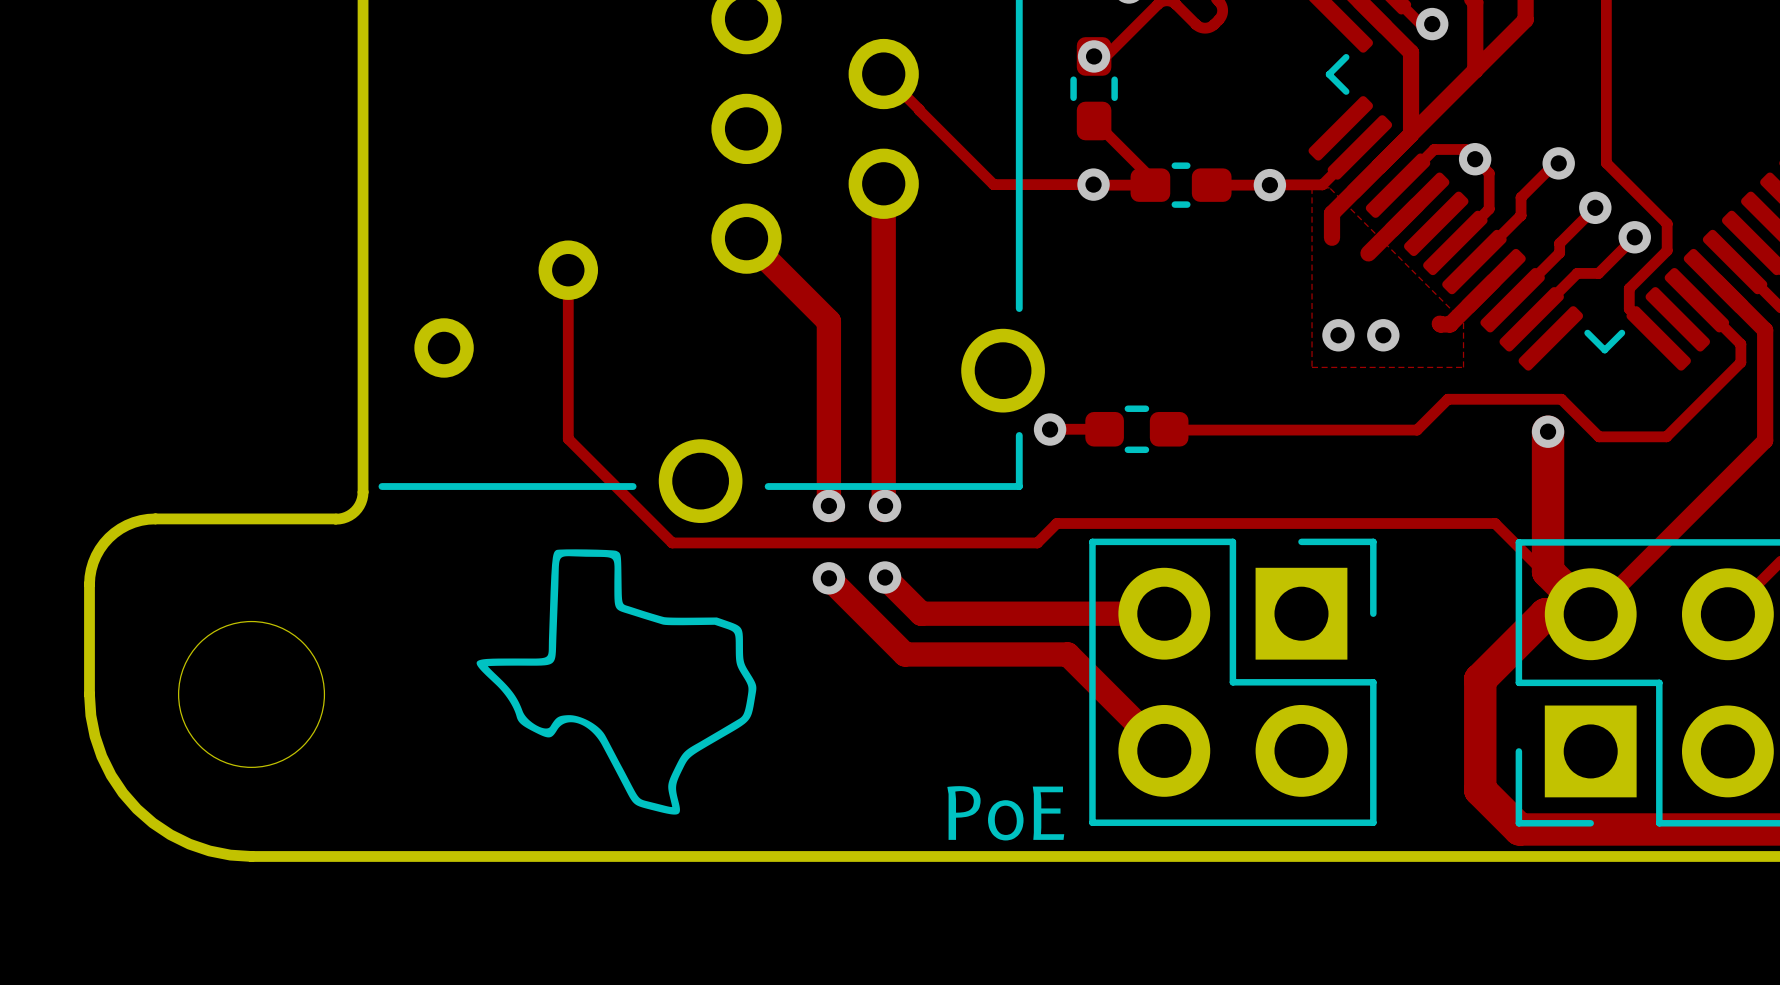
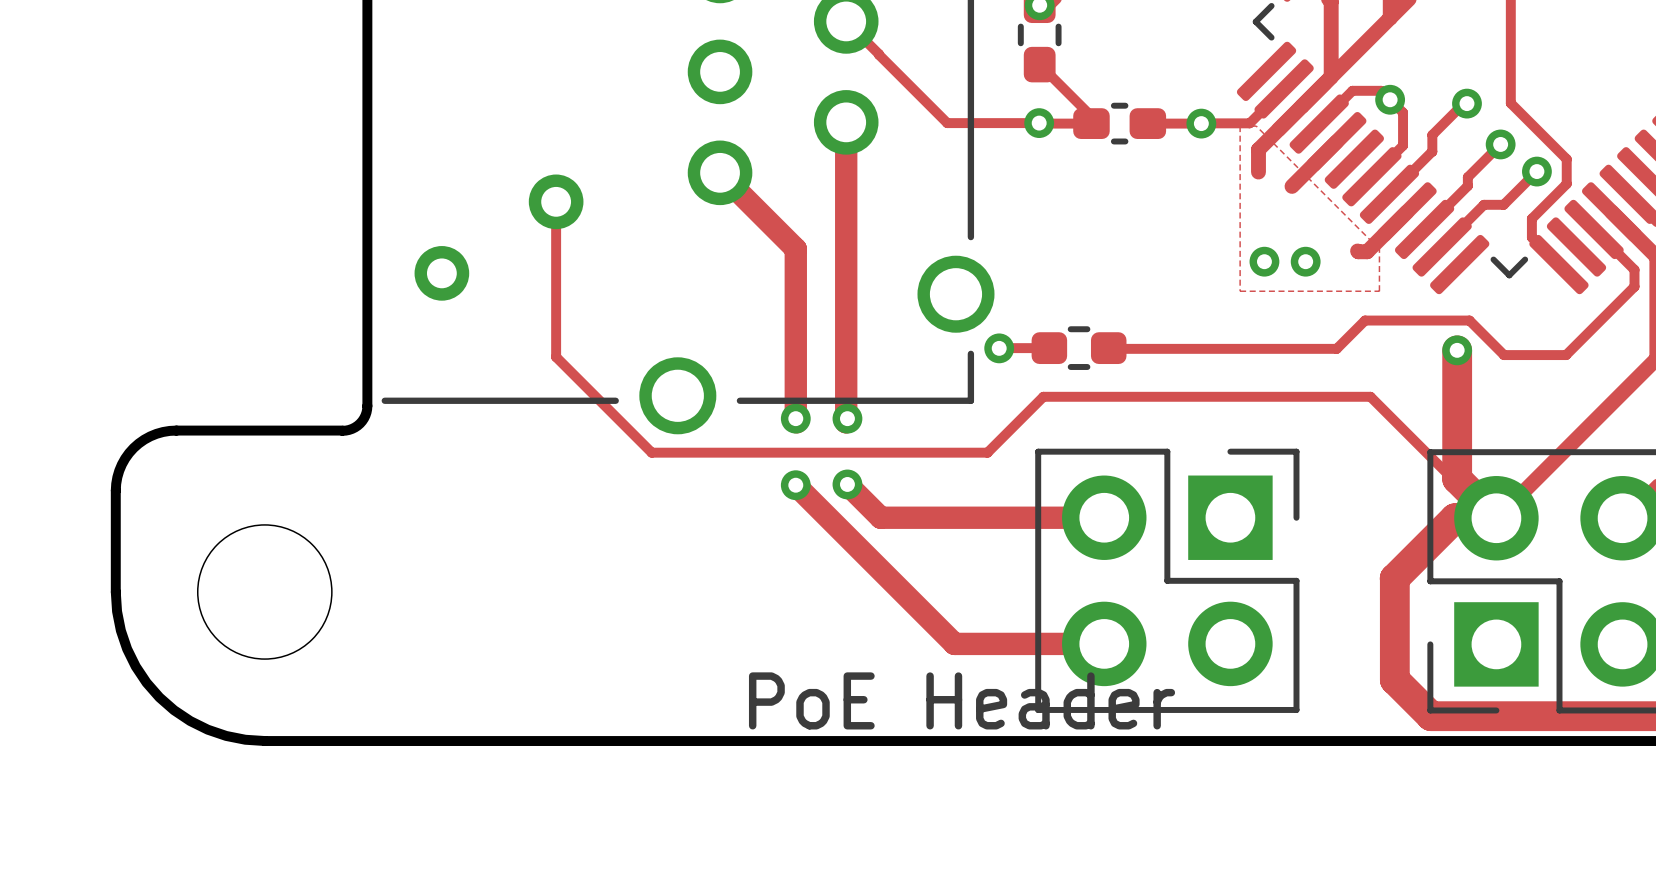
track: (1056, 523) (1495, 523) -> (1005, 434) (1043, 396) (1370, 396) (1408, 434)
drawing: [476, 549, 757, 815] -> none
track: (905, 654) (1067, 654) (1164, 750) -> (865, 555) (954, 643) (1104, 643)
part value: PoE (1005, 813) -> PoE Header (962, 700)

